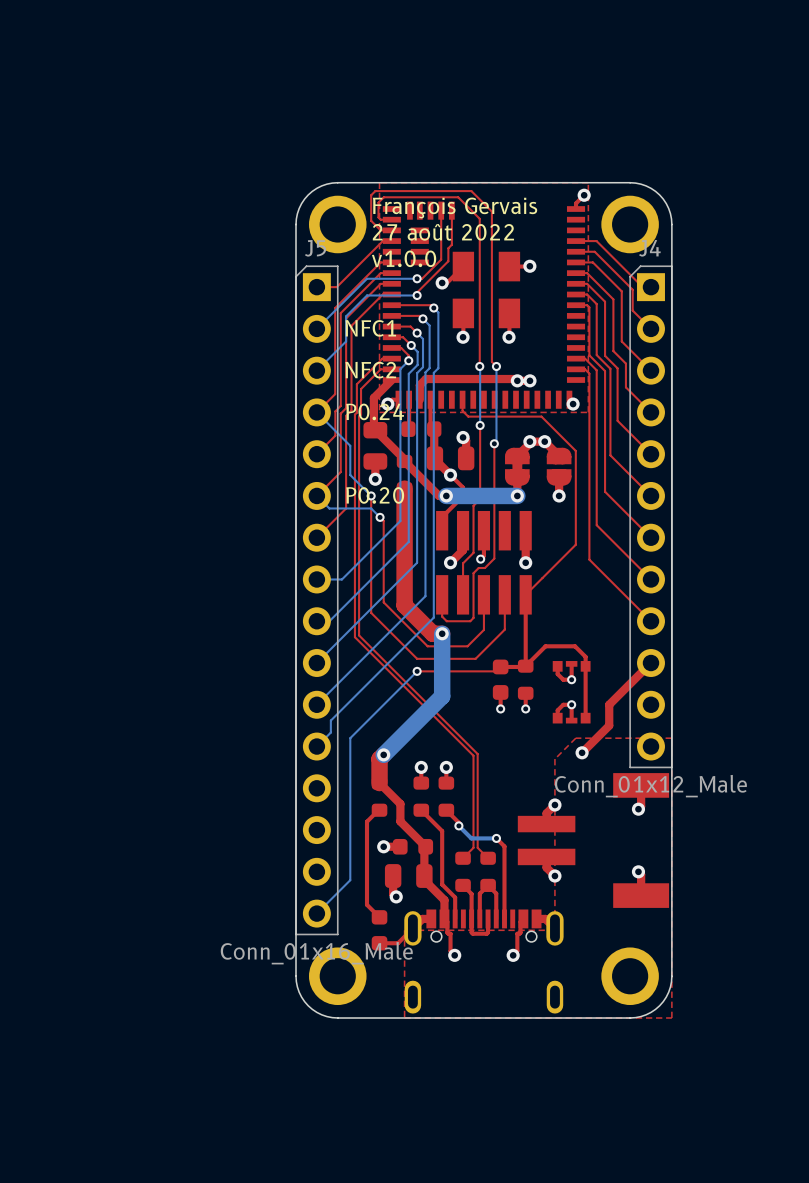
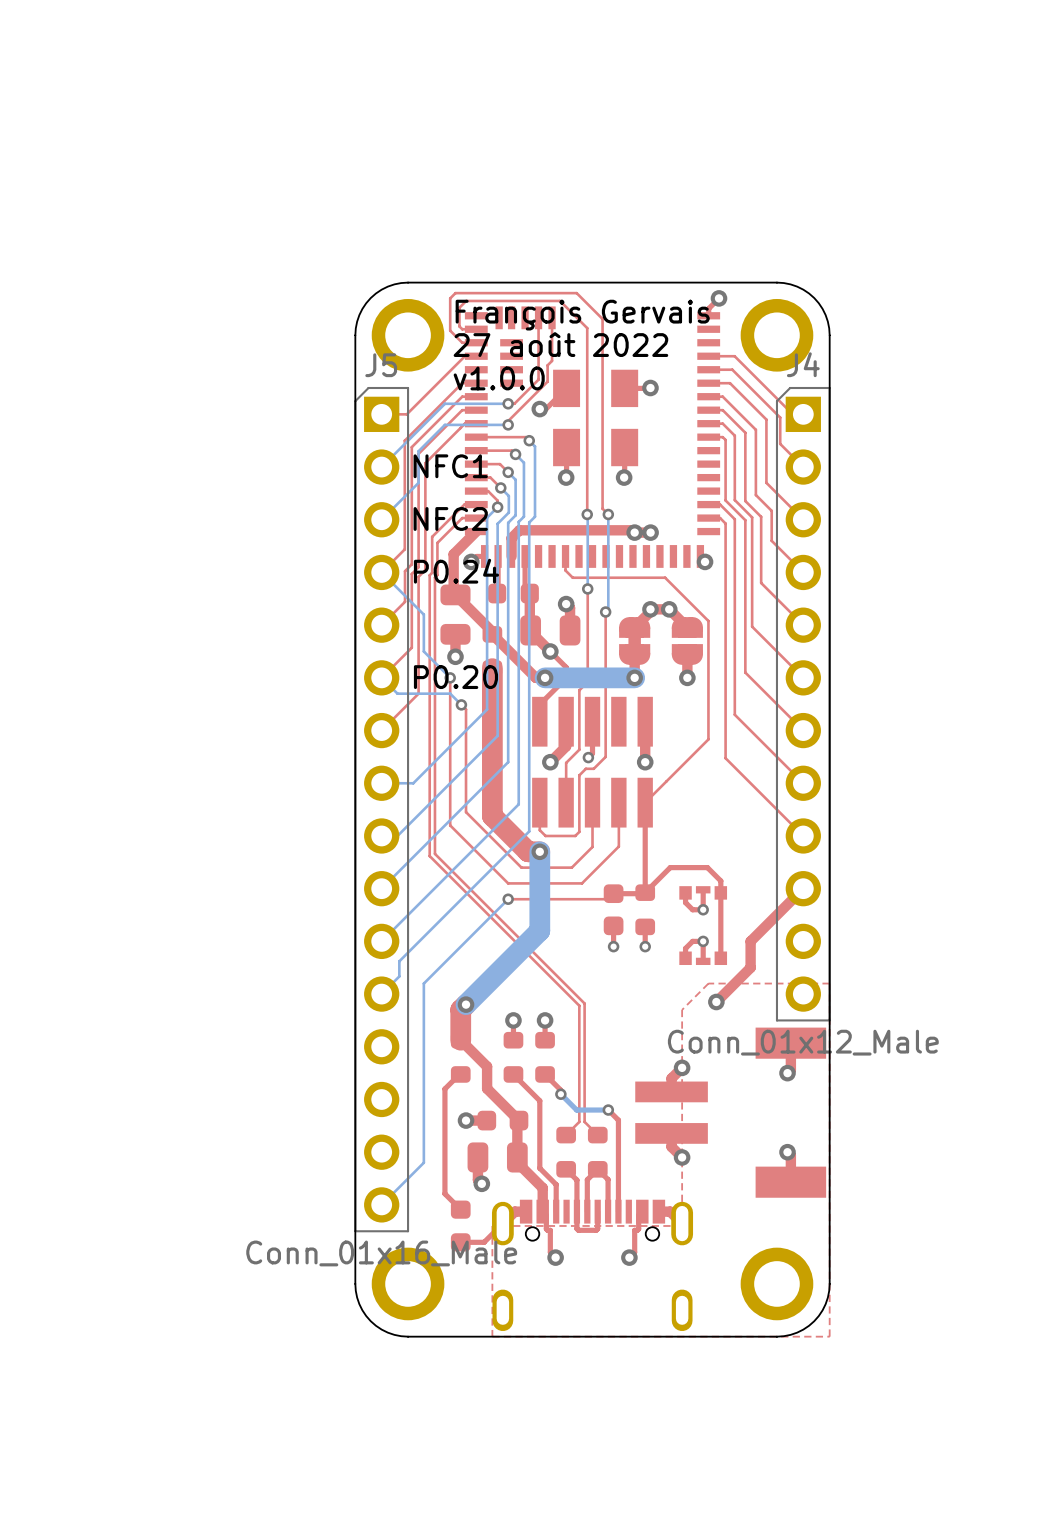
top zone outline: (588, 182) (588, 412) (379, 412) (379, 182) (588, 182) -> none

